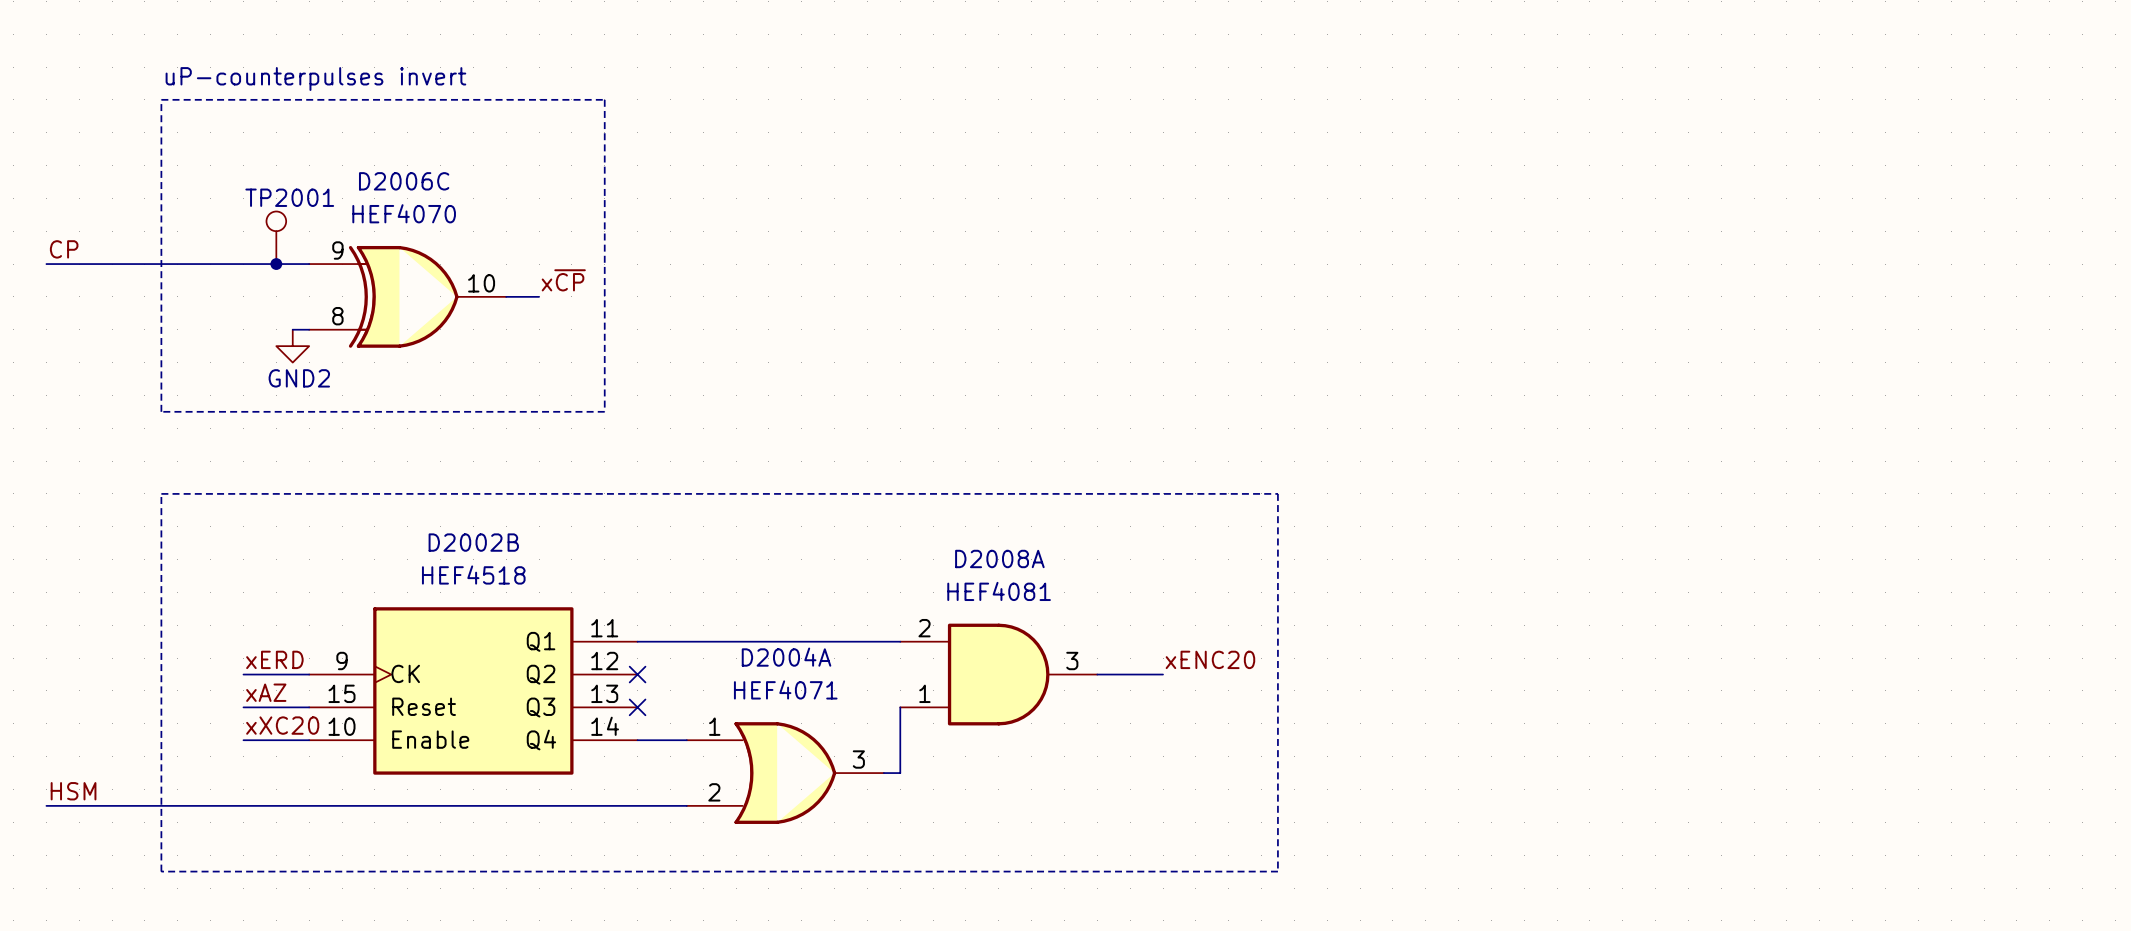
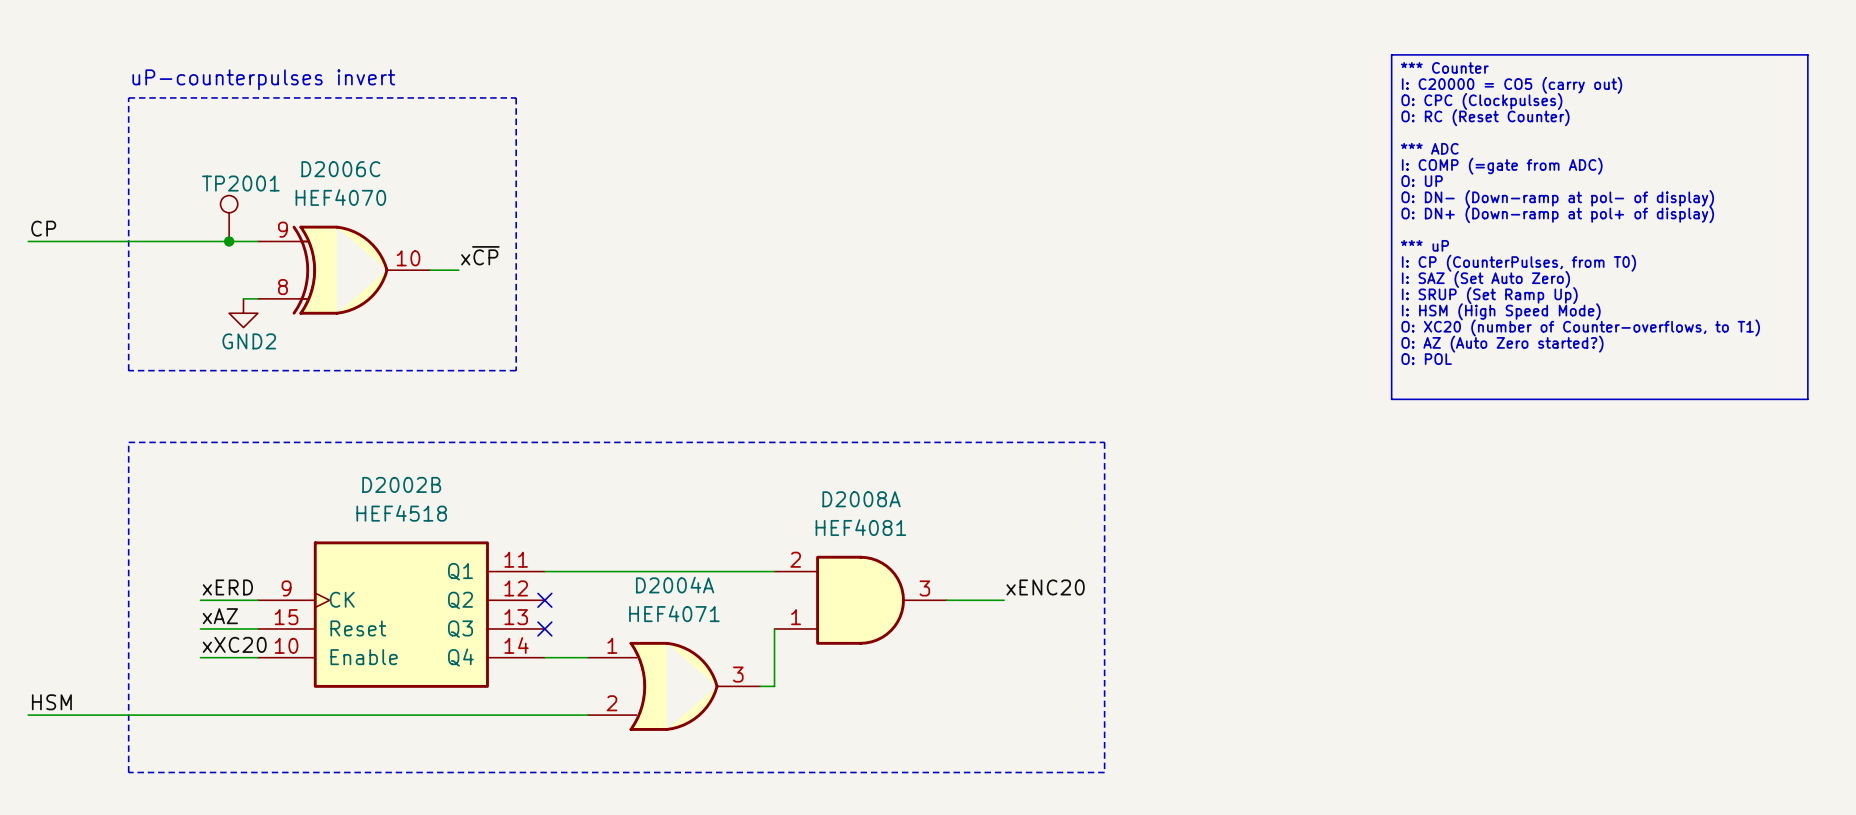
line: none -> (1391, 54) (1807, 54) (1807, 399) (1391, 399) (1391, 54)
text: none -> *** Counter (1444, 67)
text: none -> I: C20000 = CO5 (carry out) (1512, 85)
text: none -> O: CPC (Clockpulses) (1481, 101)
text: none -> O: RC (Reset Counter) (1485, 117)
text: none -> *** ADC (1429, 148)
text: none -> I: COMP (=gate from ADC) (1502, 166)
text: none -> O: UP (1422, 181)
text: none -> O: DN- (Down-ramp at pol- of display) (1557, 198)
text: none -> O: DN+ (Down-ramp at pol+ of display) (1557, 214)
text: none -> *** uP (1424, 245)
text: none -> I: CP (CounterPulses, from T0) (1518, 263)
text: none -> I: SAZ (Set Auto Zero) (1485, 279)
text: none -> I: SRUP (Set Ramp Up) (1489, 295)
text: none -> I: HSM (High Speed Mode) (1501, 311)
text: none -> O: XC20 (number of Counter-overflows, to T1) (1580, 327)
text: none -> O: AZ (Auto Zero started?) (1502, 344)
text: none -> O: POL (1426, 359)

